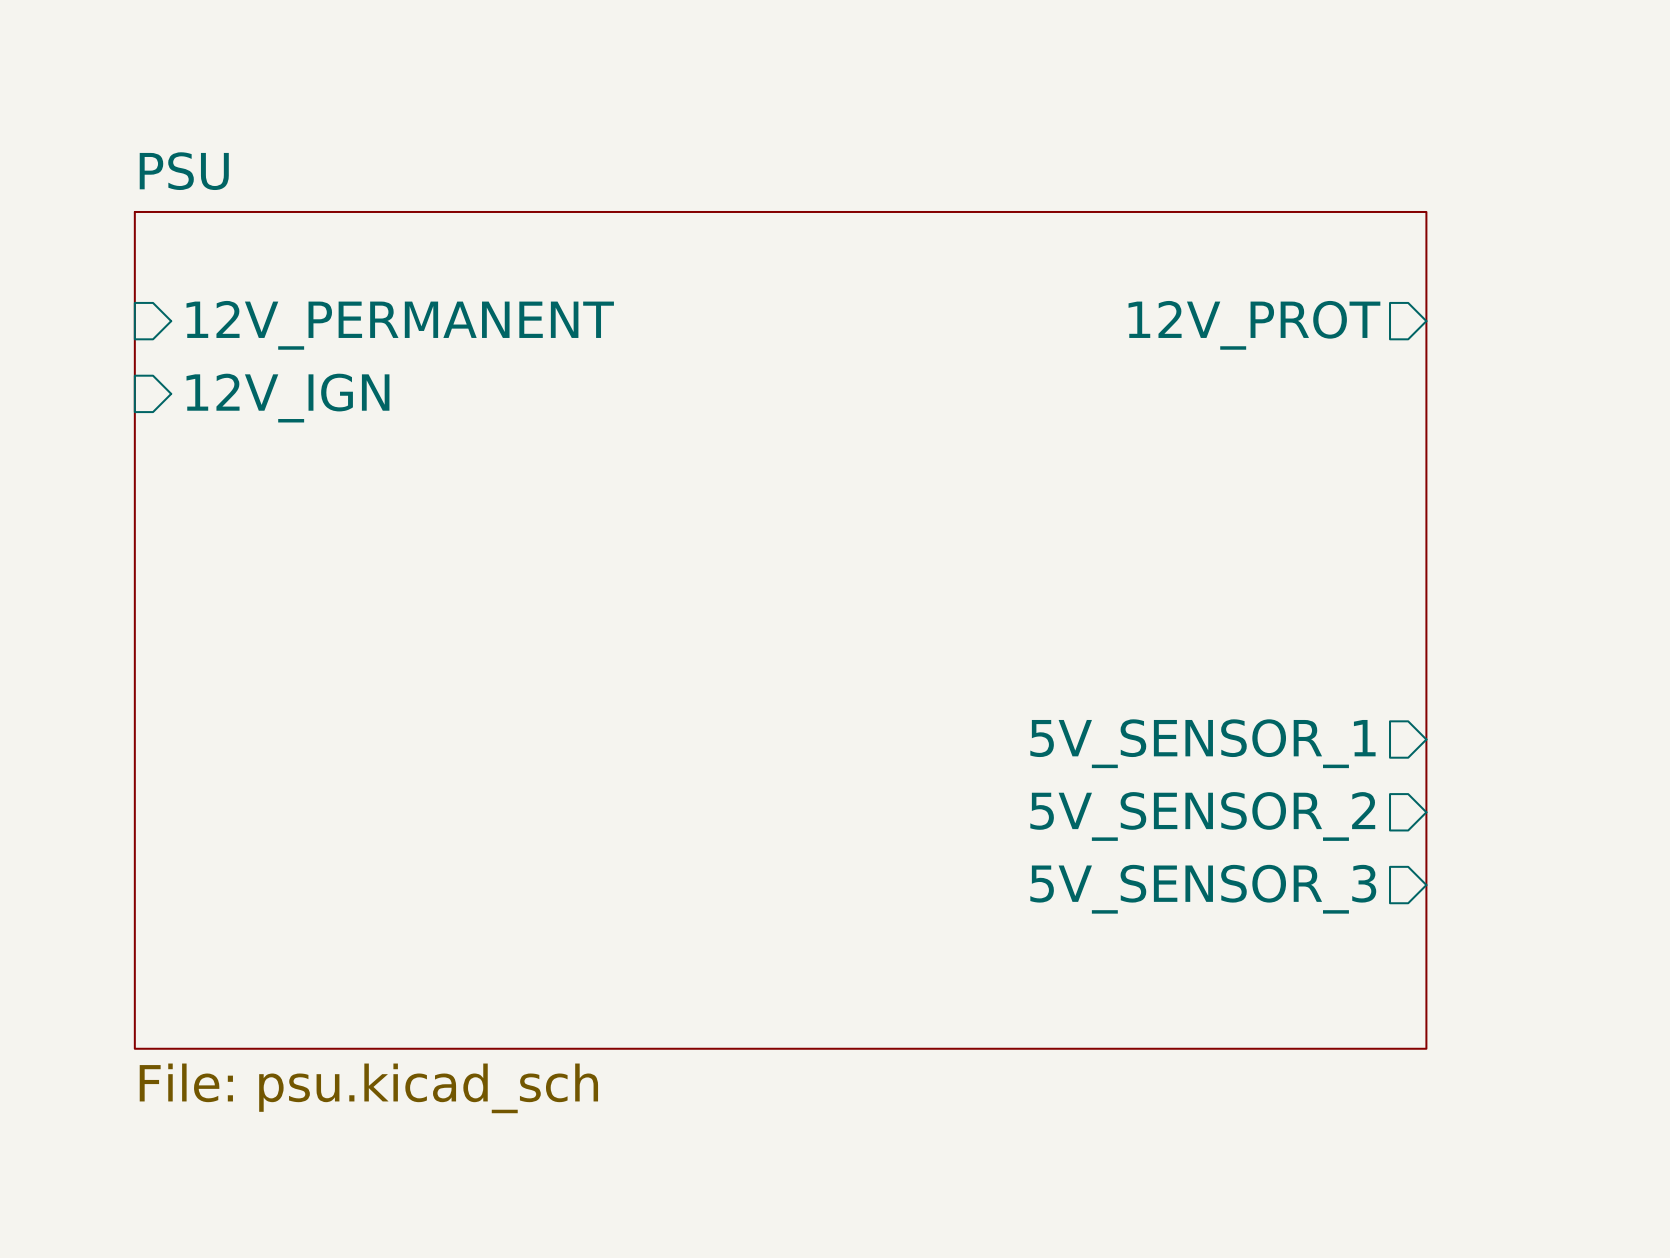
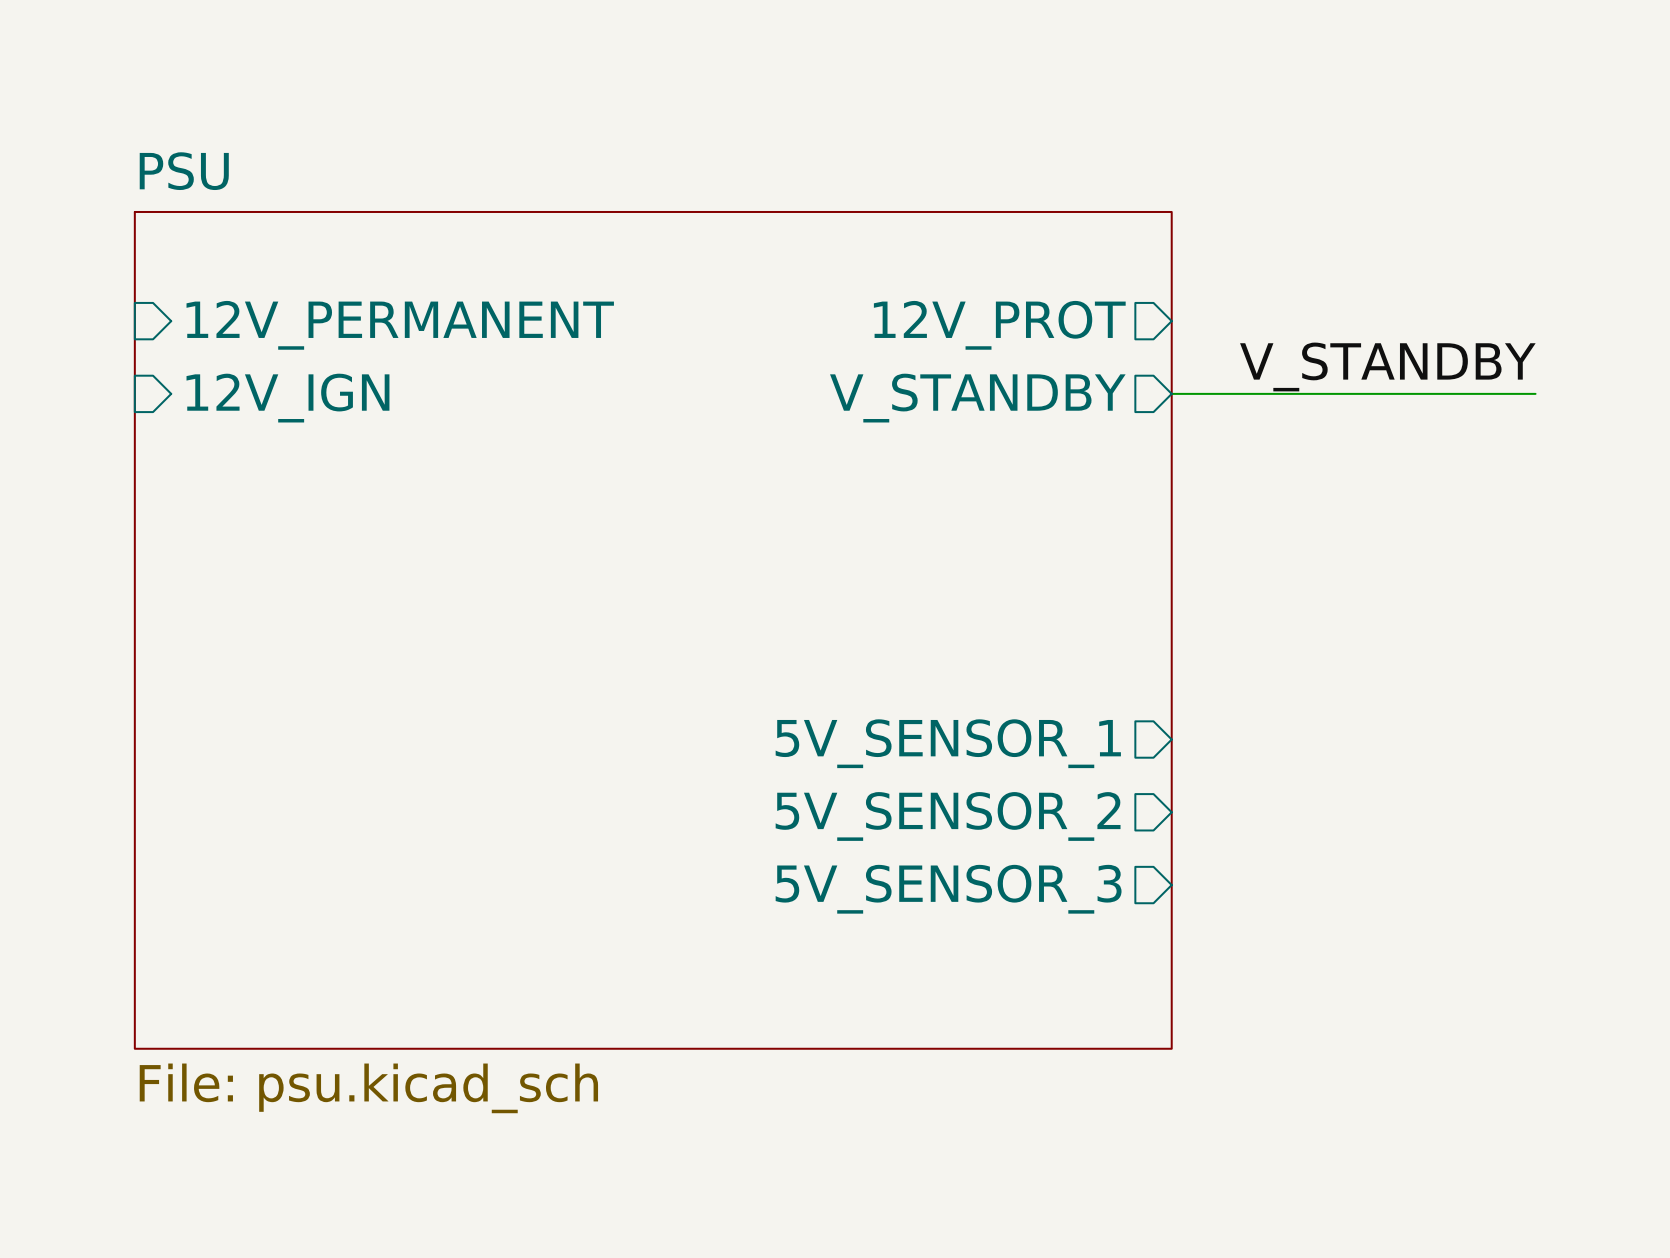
sheet pin position: 12V_PROT (1254, 325) -> 12V_PROT (999, 325)
label: none -> V_STANDBY (1387, 366)
wire: none -> (1171, 393) (1535, 393)
sheet pin: none -> V_STANDBY (977, 398)
sheet PSU: none -> File: psu.kicad_sch (653, 630)
sheet PSU: File: psu.kicad_sch (780, 630) -> none
sheet pin position: 5V_SENSOR_1 (1202, 743) -> 5V_SENSOR_1 (948, 743)
sheet pin position: 5V_SENSOR_2 (1202, 816) -> 5V_SENSOR_2 (948, 816)
sheet pin position: 5V_SENSOR_3 (1203, 889) -> 5V_SENSOR_3 (948, 889)

